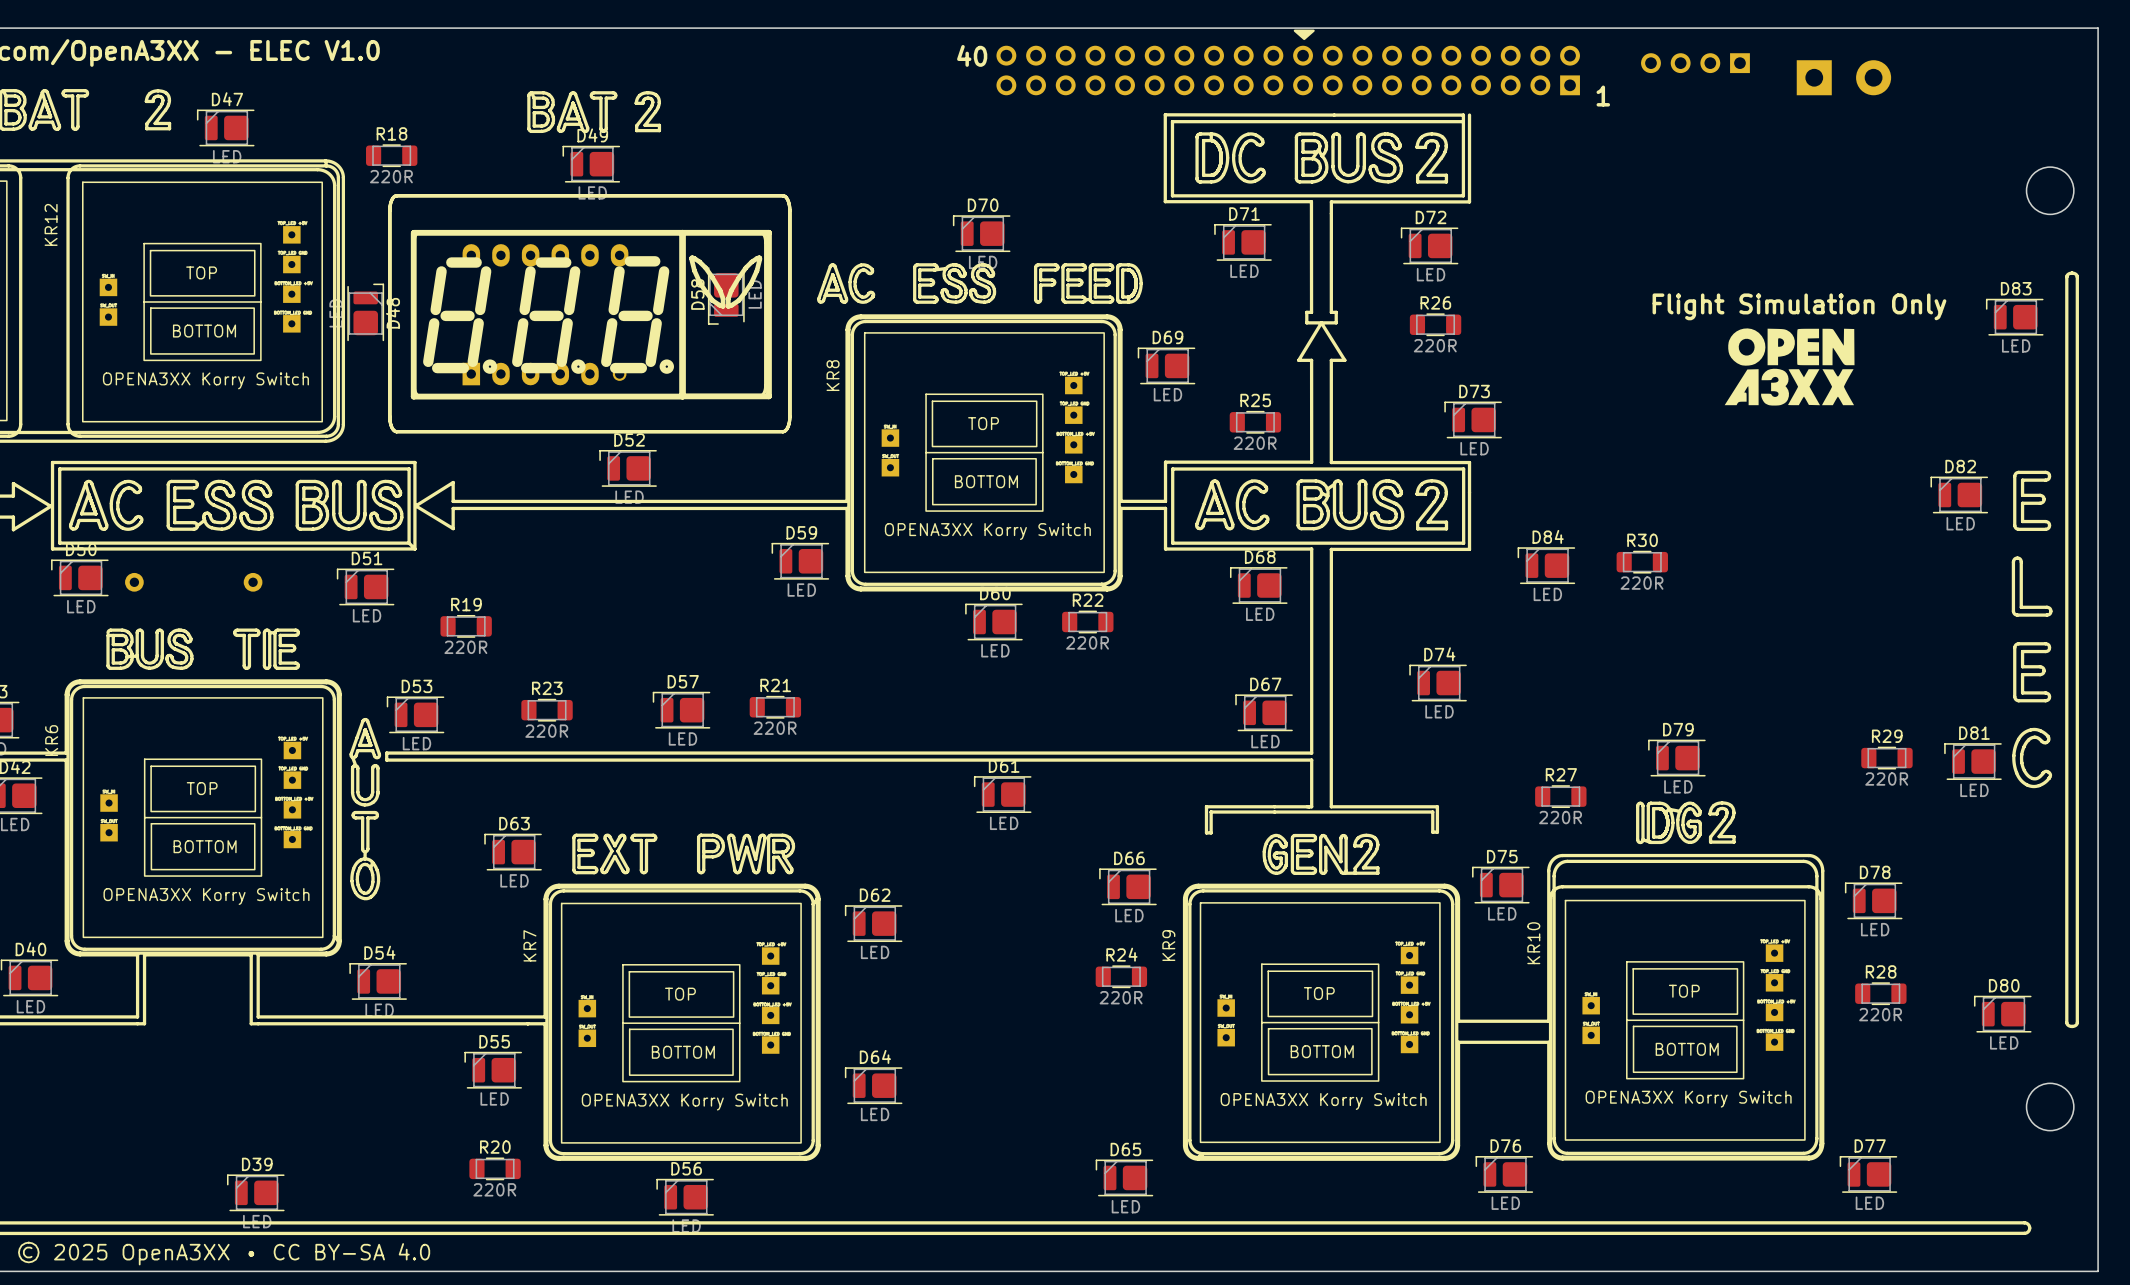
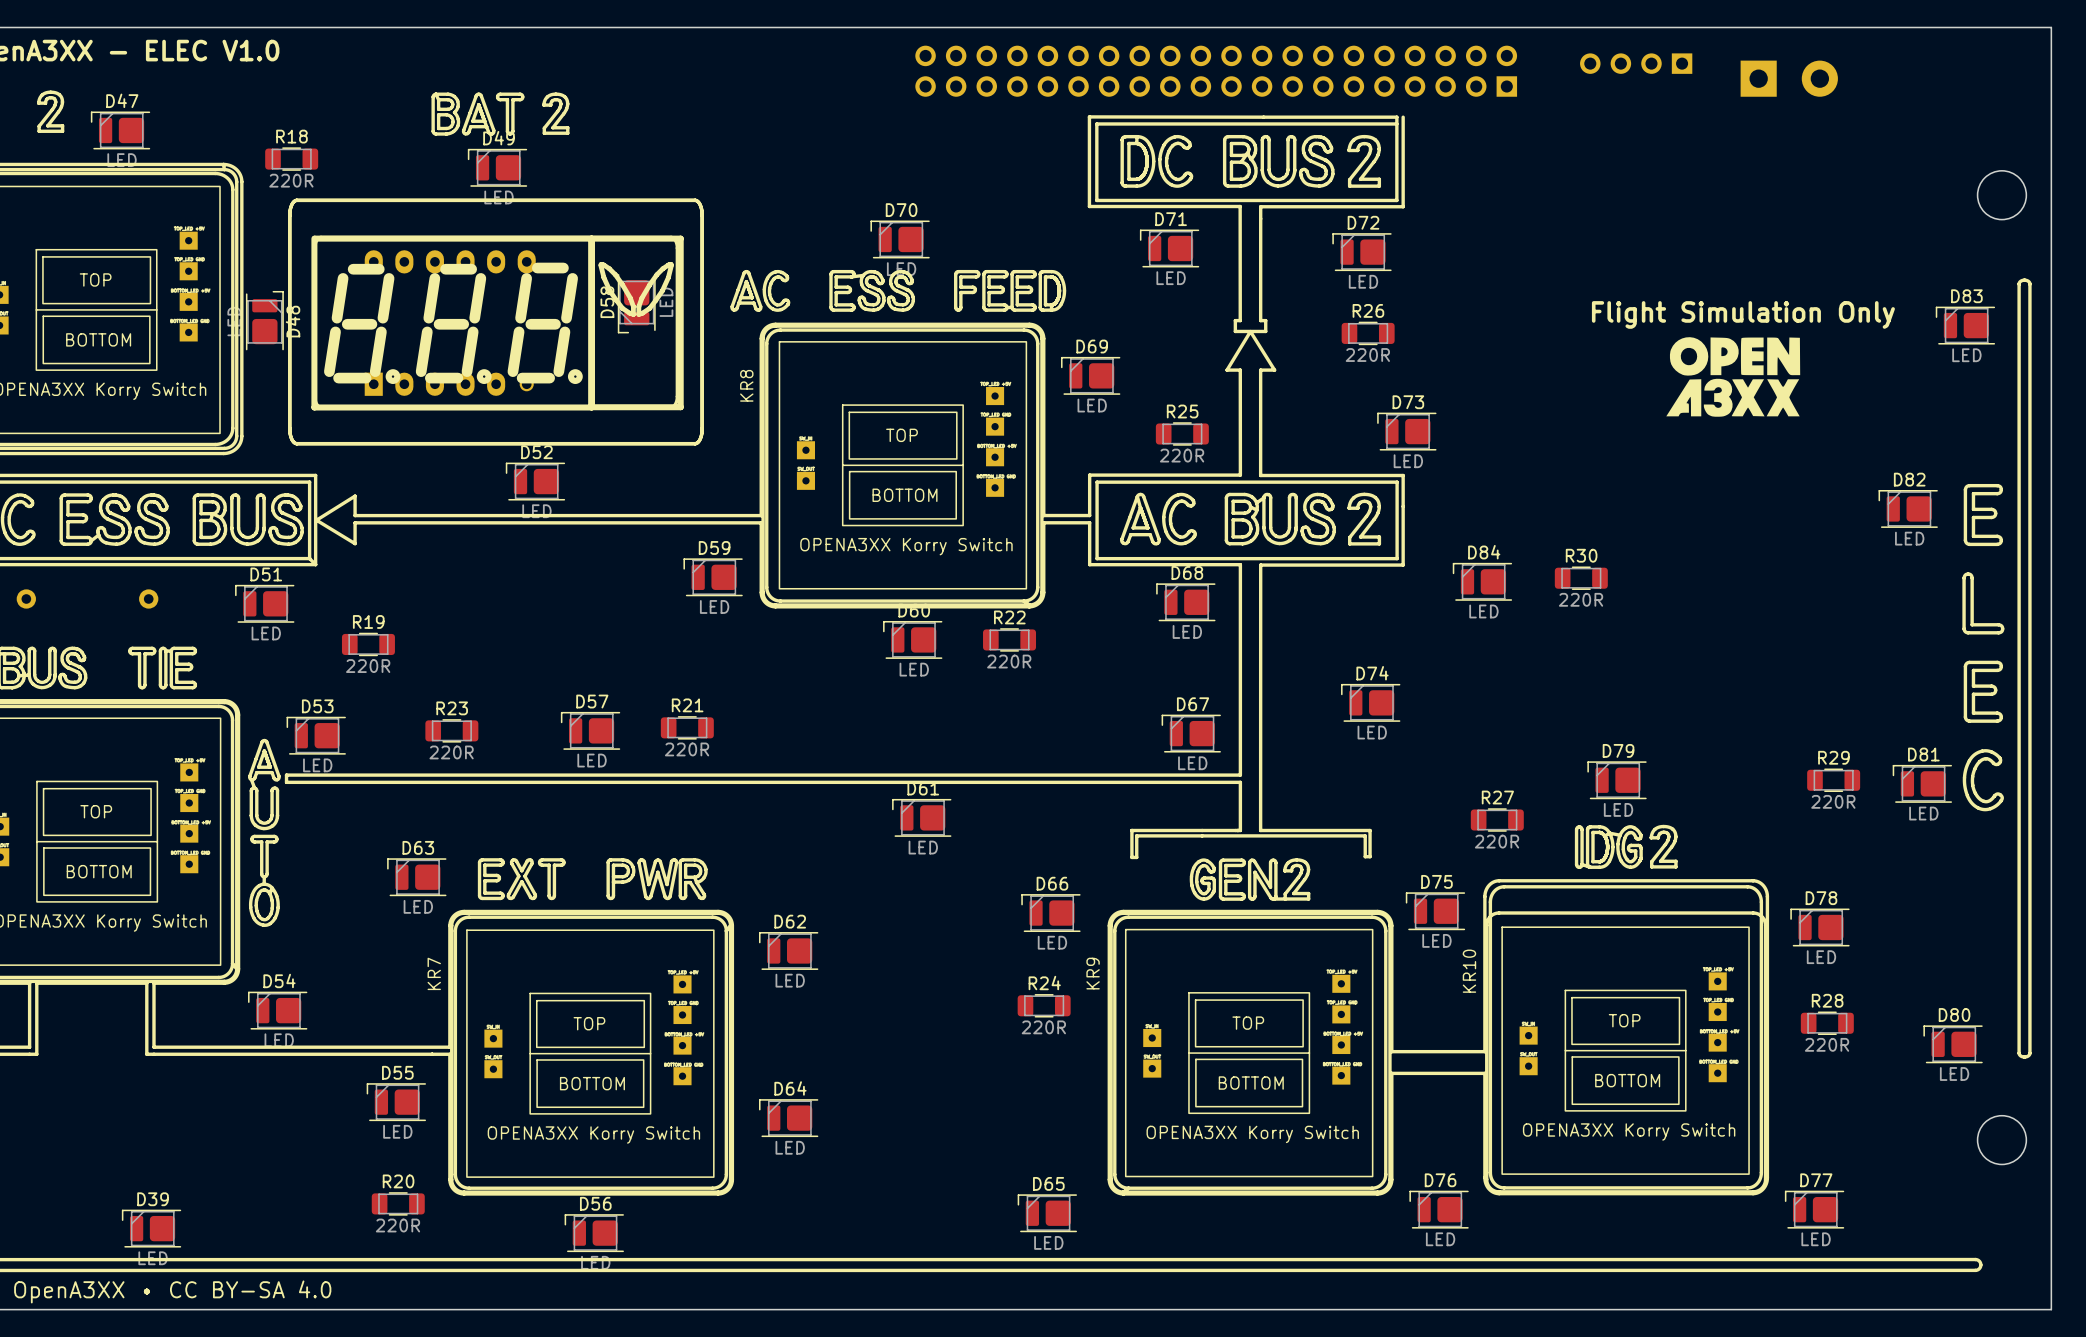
drawing: [1293, 29, 1315, 41] -> none
text: 40 (972, 55) -> none
text: 1 (1603, 96) -> none

